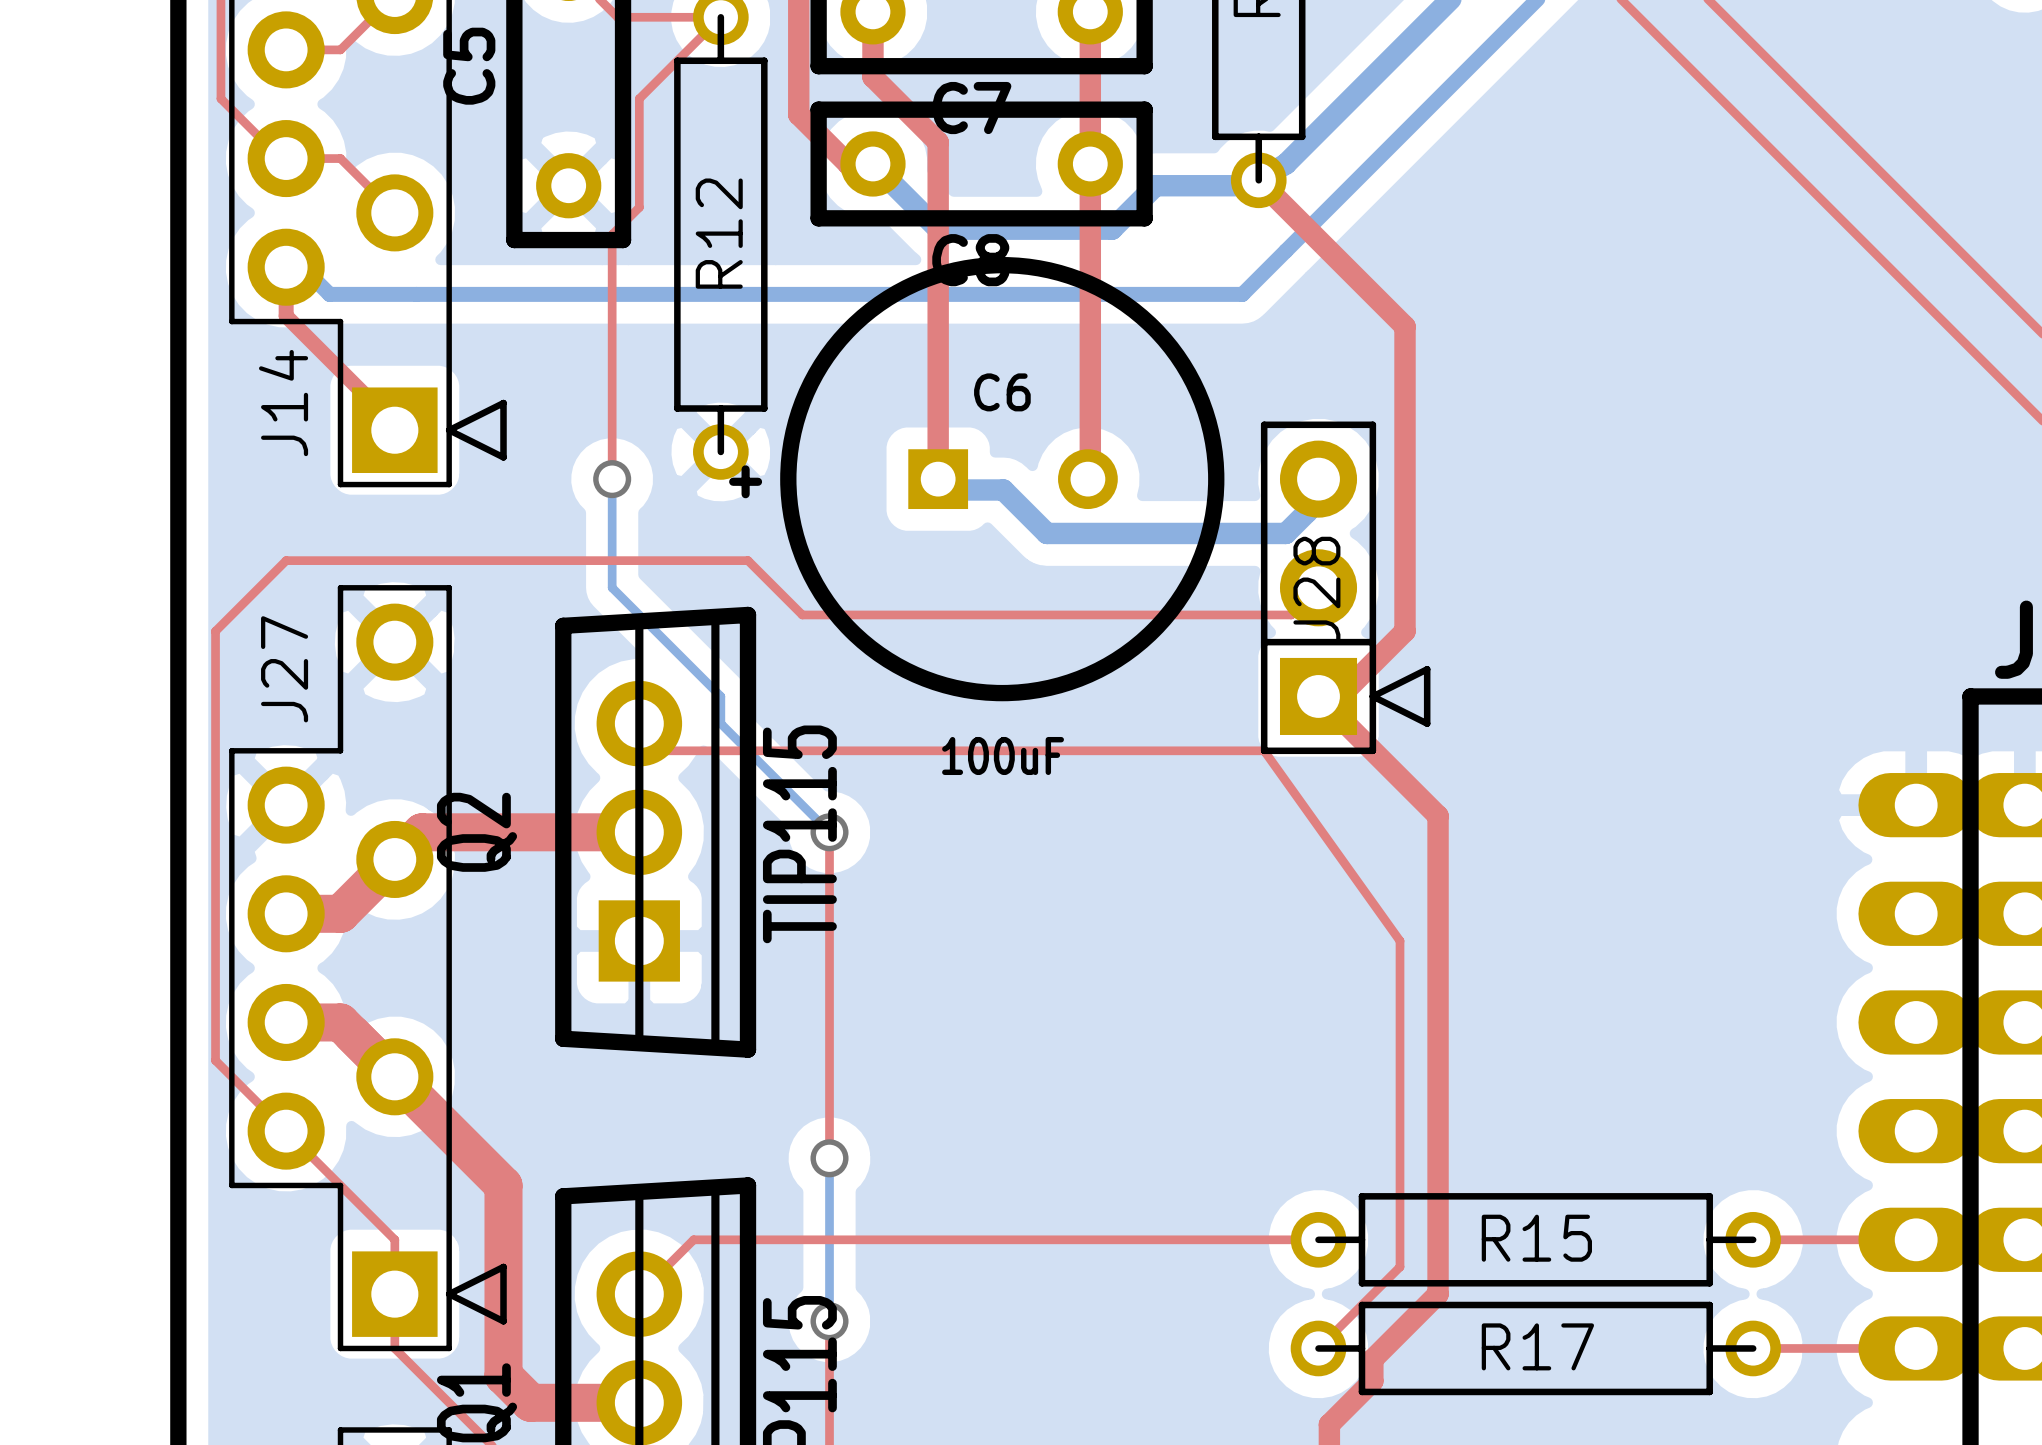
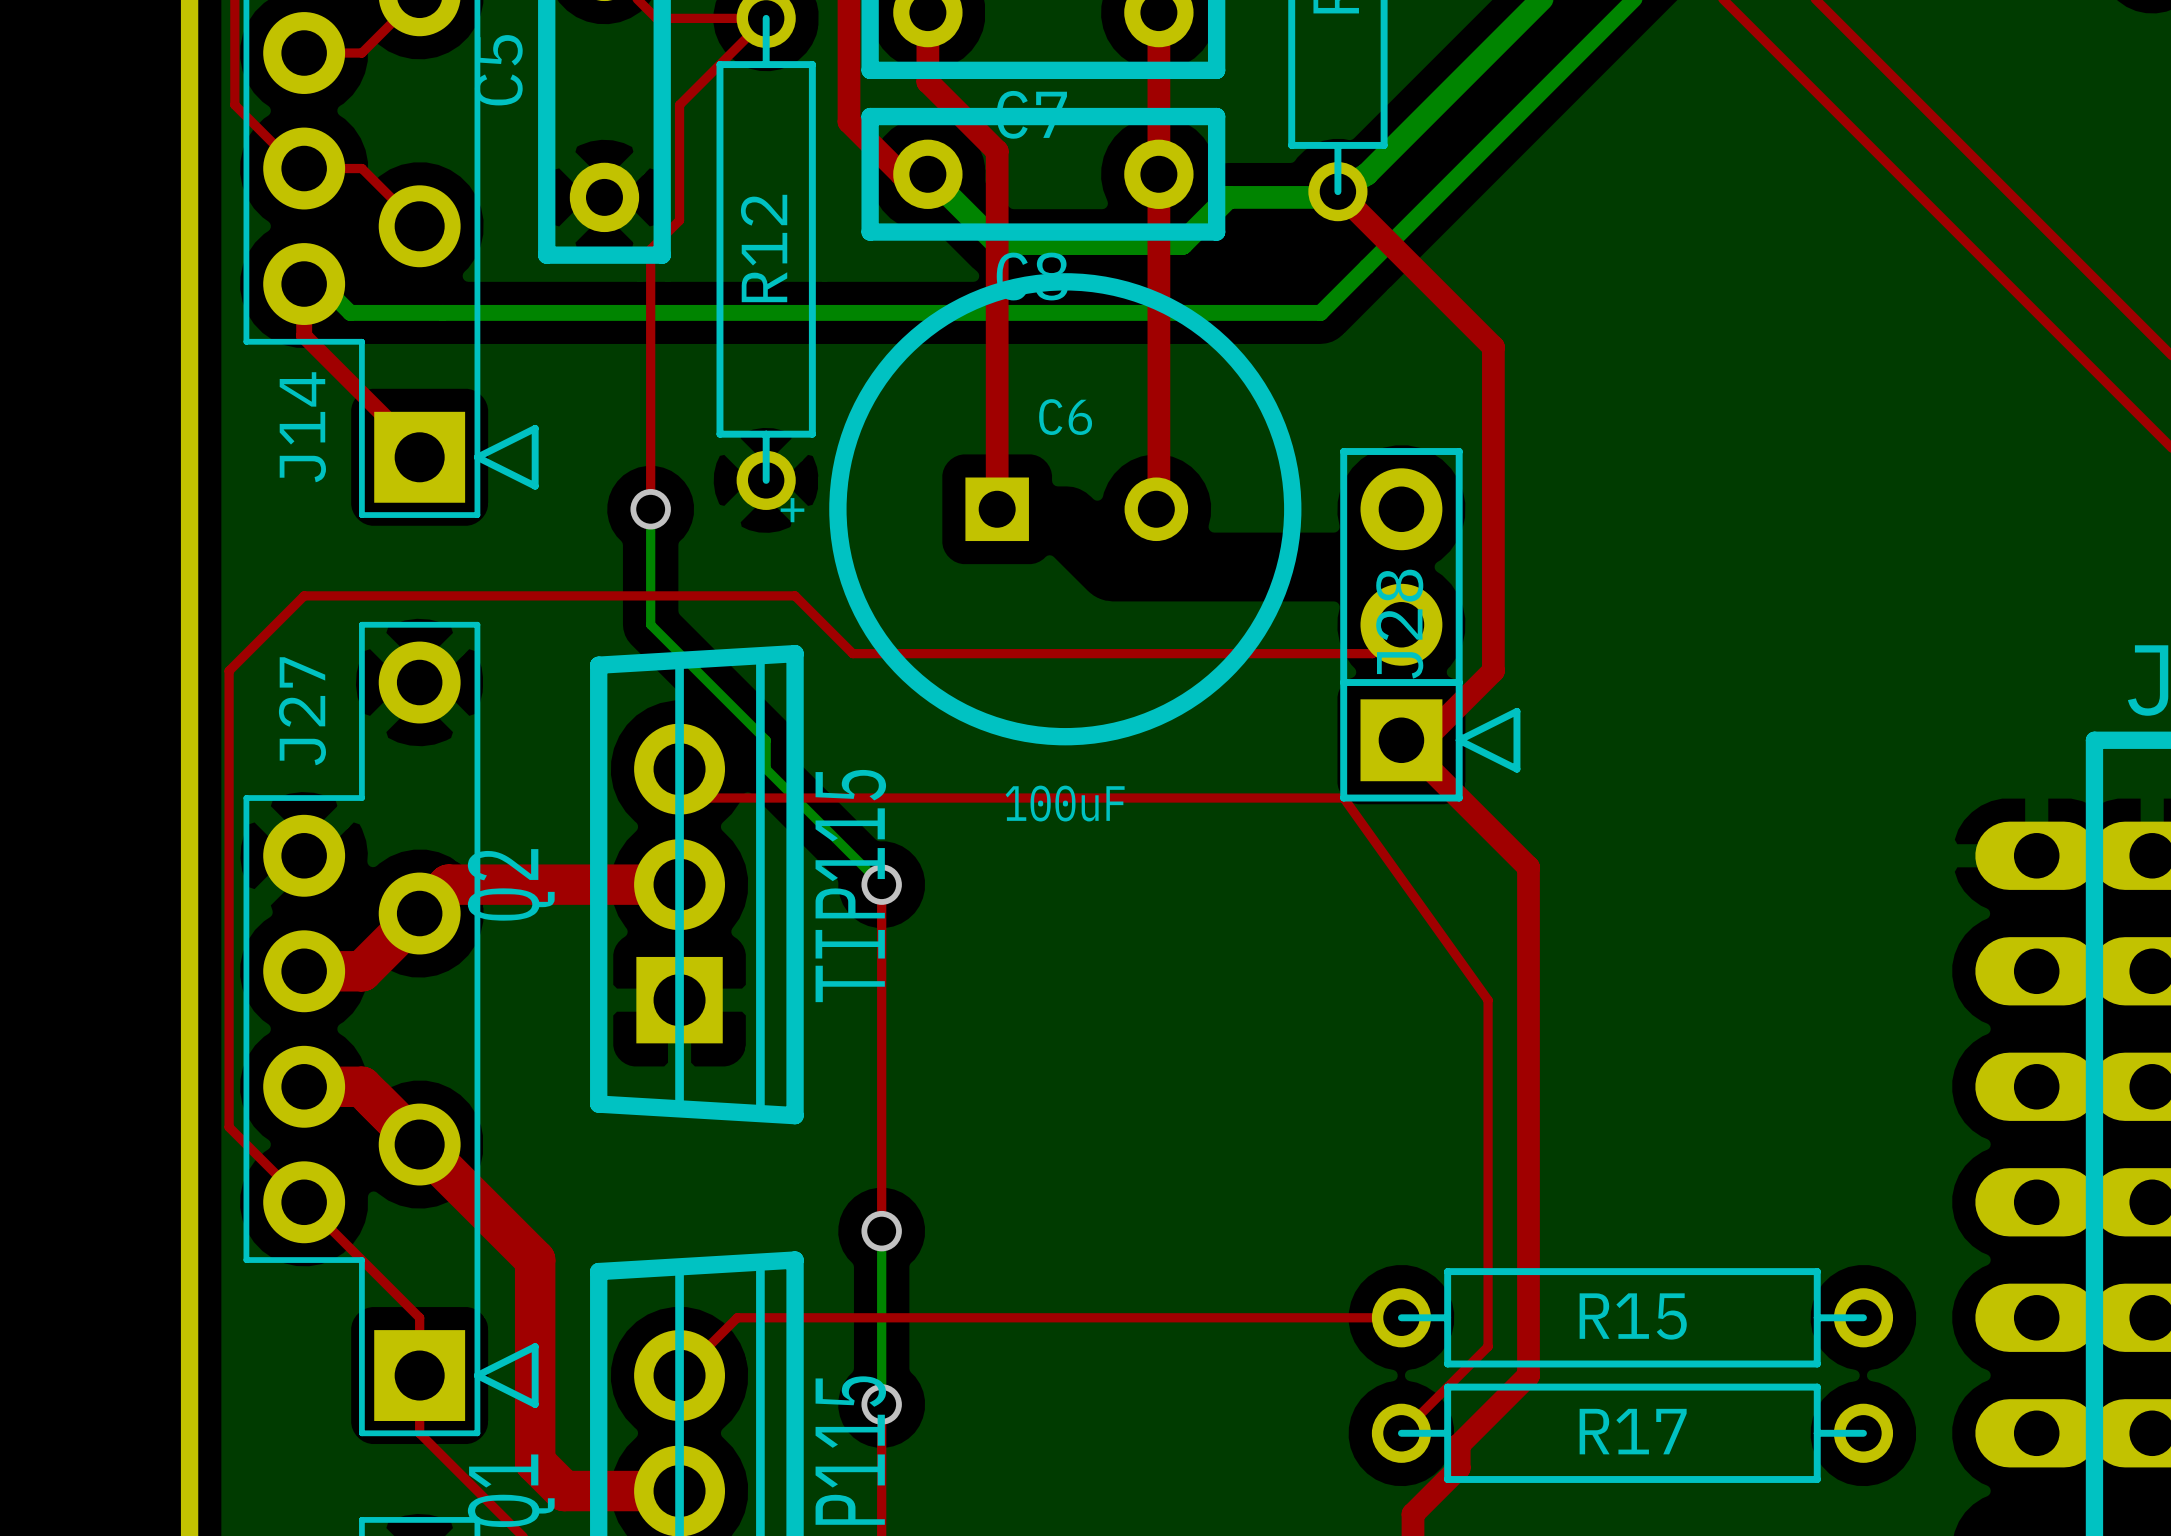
bottom track: (938, 479) (938, 489) (1003, 489) (1046, 533) (1285, 533) (1307, 511) (1318, 479) -> none
top track: (1753, 1239) (1916, 1239) -> none
top track: (1753, 1348) (1916, 1348) -> none

